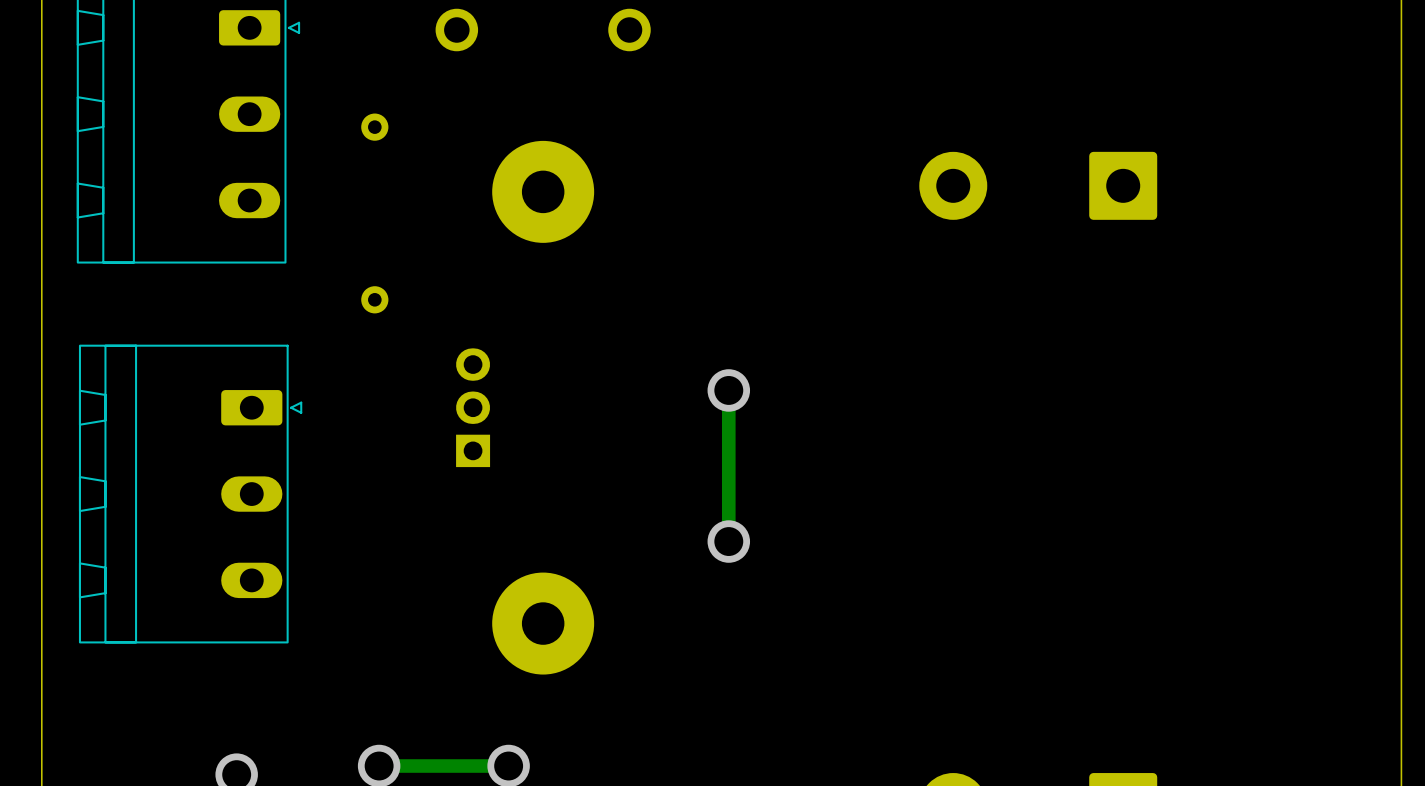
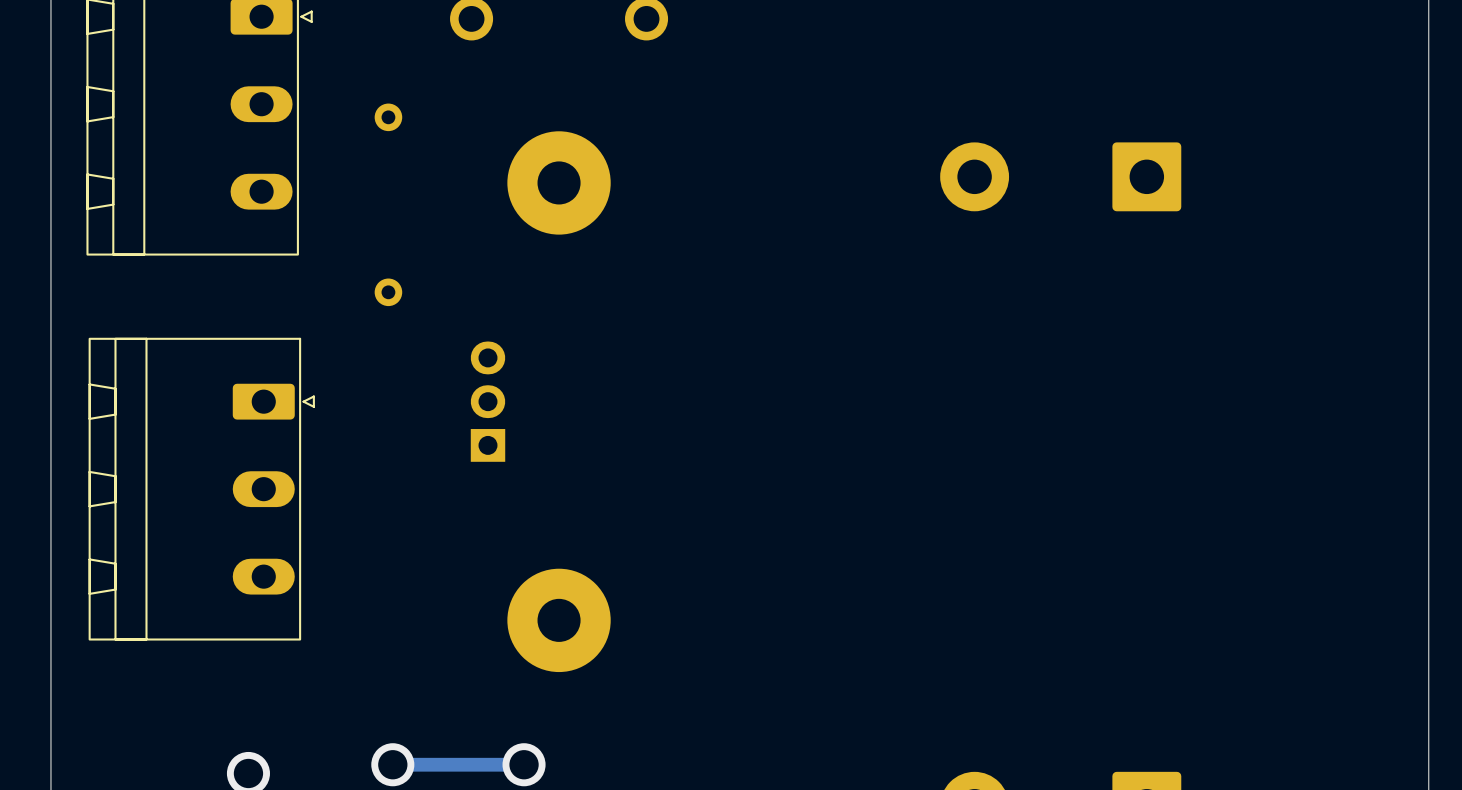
track: (728, 390) (728, 541) -> none
via: (728, 390) -> none
via: (728, 541) -> none

